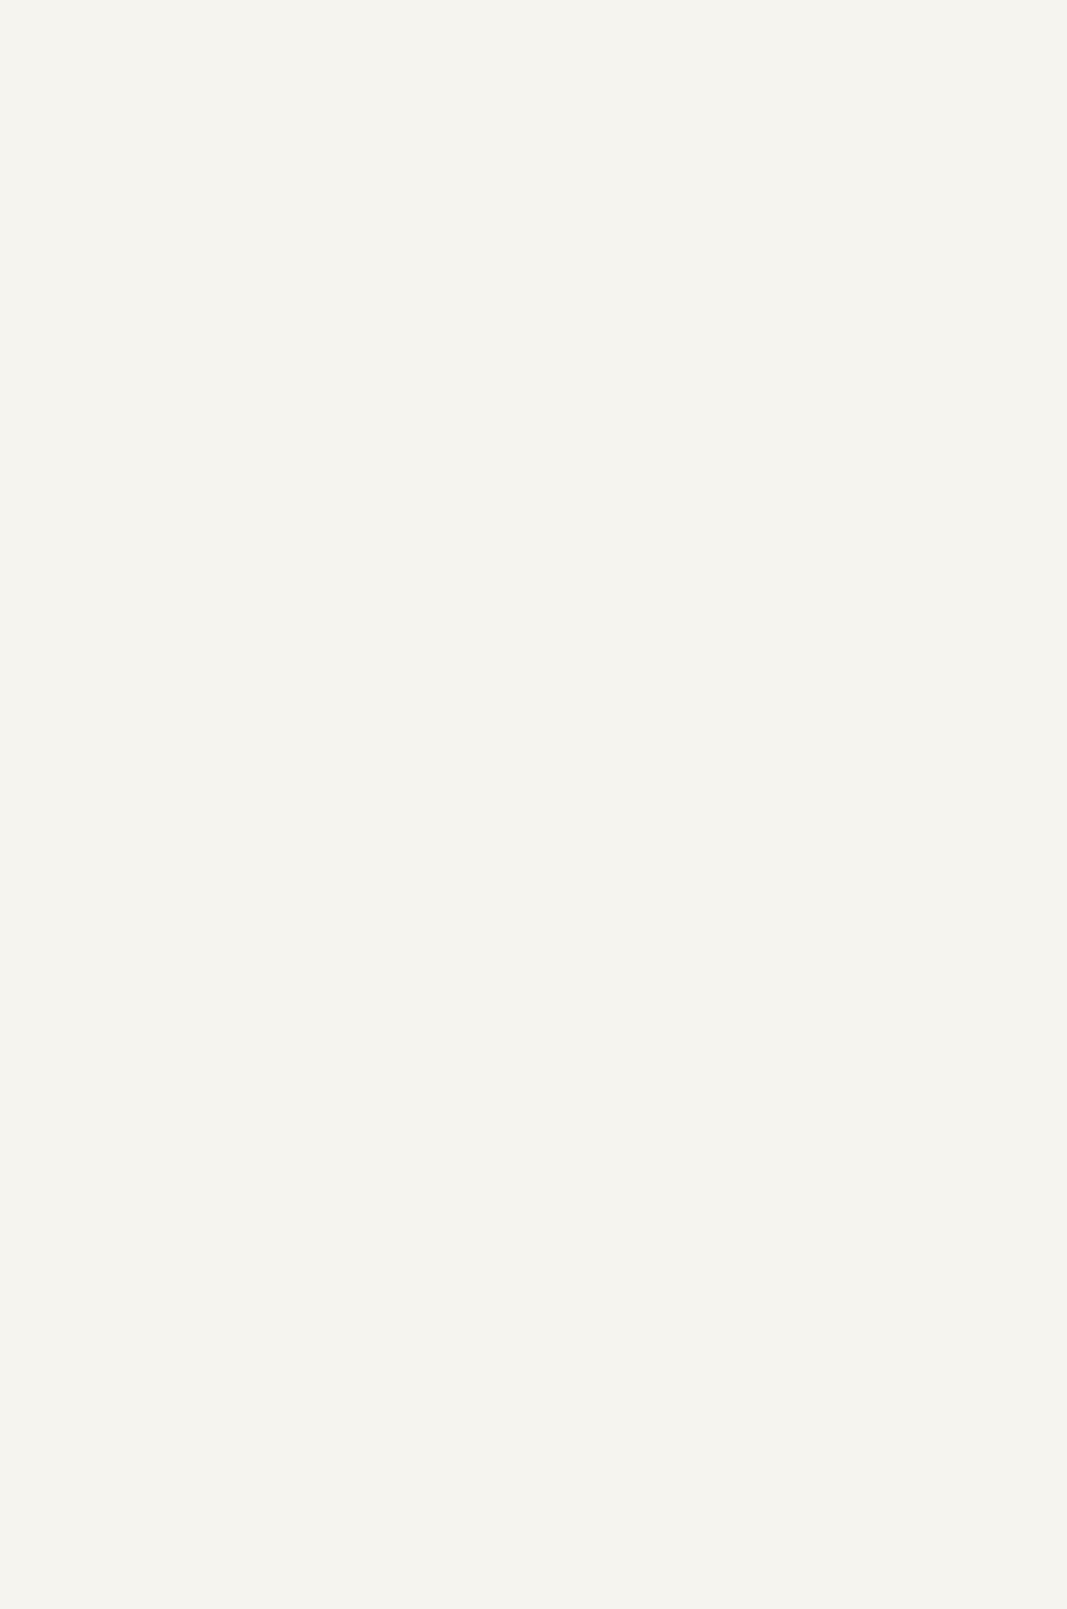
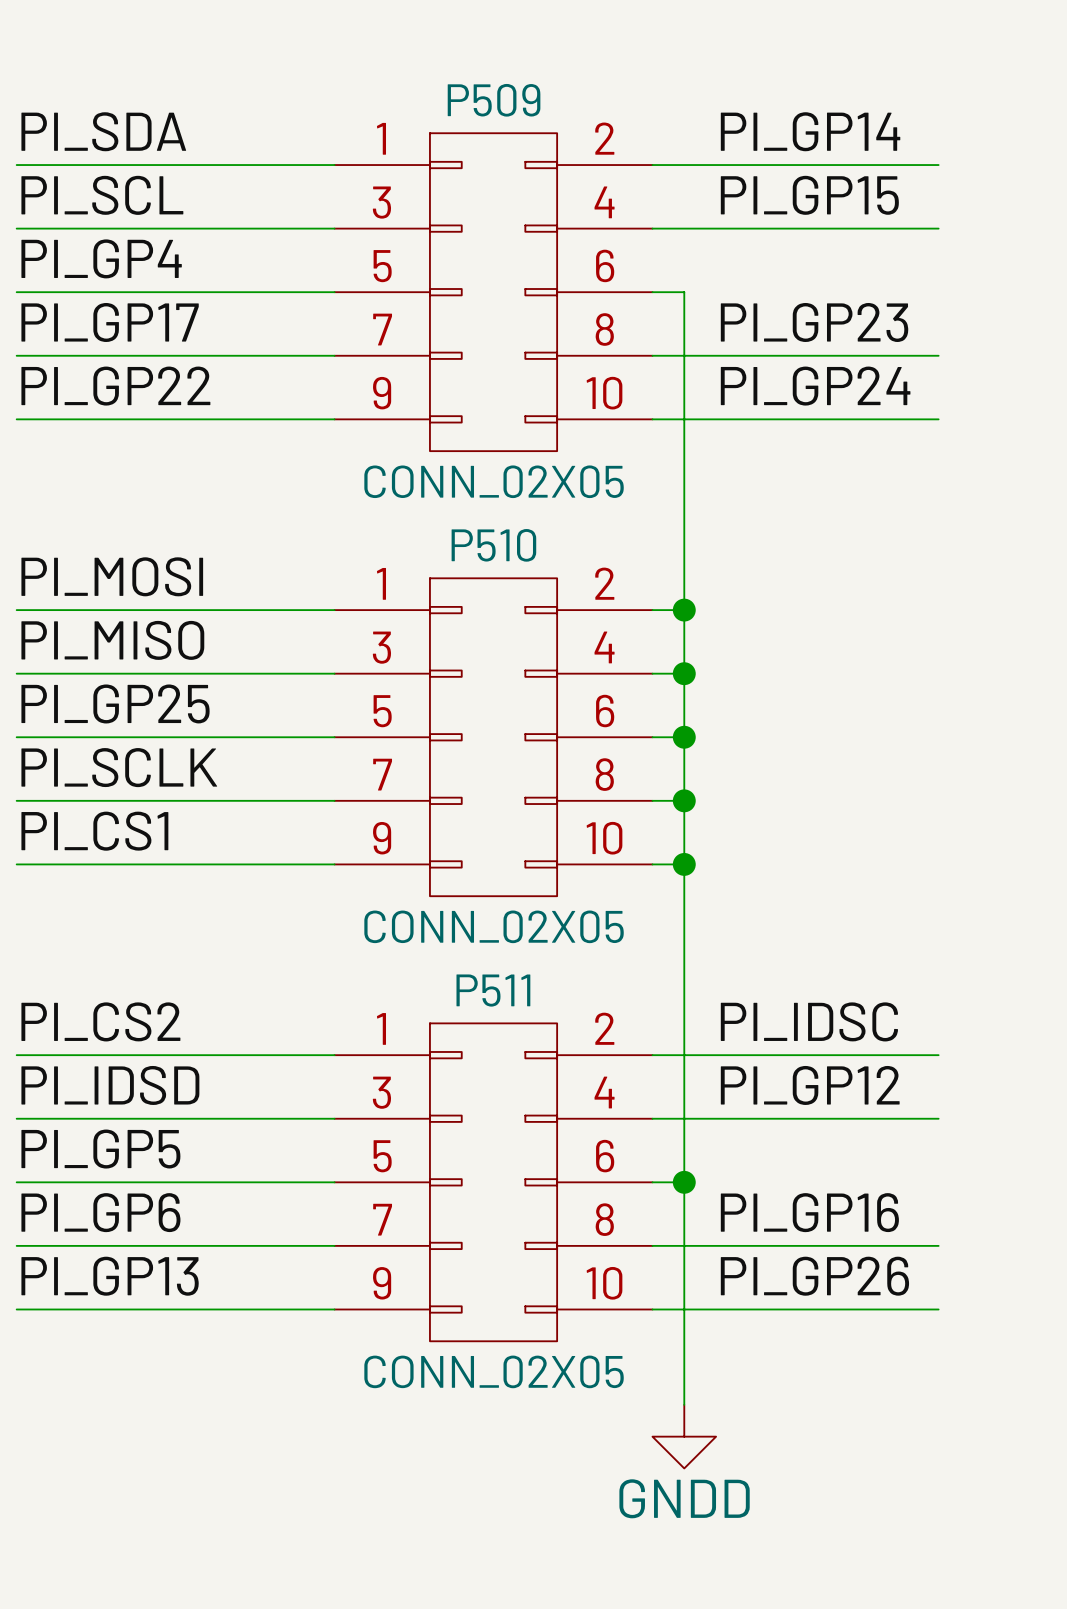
label: none -> PI_SDA (103, 131)
label: none -> PI_GP14 (810, 131)
wire: none -> (16, 165) (334, 165)
wire: none -> (652, 165) (938, 165)
label: none -> PI_SCL (102, 195)
label: none -> PI_GP15 (809, 195)
wire: none -> (16, 228) (334, 228)
wire: none -> (652, 228) (938, 228)
label: none -> PI_GP4 (101, 258)
wire: none -> (16, 292) (334, 292)
P509: none -> CONN_02X05 (493, 292)
wire: none -> (652, 292) (684, 292) (684, 1404)
label: none -> PI_GP17 (110, 322)
label: none -> PI_GP23 (814, 322)
wire: none -> (16, 355) (334, 355)
wire: none -> (652, 355) (938, 355)
label: none -> PI_GP22 (115, 386)
label: none -> PI_GP24 (815, 386)
wire: none -> (16, 419) (334, 419)
wire: none -> (652, 419) (938, 419)
label: none -> PI_MOSI (112, 576)
wire: none -> (16, 610) (334, 610)
wire: none -> (652, 610) (684, 610)
junction: none -> (684, 610)
label: none -> PI_MISO (112, 640)
wire: none -> (16, 673) (334, 673)
wire: none -> (652, 673) (684, 673)
junction: none -> (684, 673)
label: none -> PI_GP25 (115, 703)
wire: none -> (16, 737) (334, 737)
P510: none -> CONN_02X05 (493, 737)
wire: none -> (652, 737) (684, 737)
junction: none -> (684, 737)
label: none -> PI_SCLK (119, 767)
wire: none -> (16, 800) (334, 800)
wire: none -> (652, 800) (684, 800)
junction: none -> (684, 800)
label: none -> PI_CS1 (94, 831)
wire: none -> (16, 864) (334, 864)
wire: none -> (652, 864) (684, 864)
junction: none -> (684, 864)
label: none -> PI_CS2 (100, 1021)
label: none -> PI_IDSC (809, 1021)
wire: none -> (16, 1055) (334, 1055)
wire: none -> (652, 1055) (938, 1055)
label: none -> PI_IDSD (110, 1085)
label: none -> PI_GP12 (810, 1085)
wire: none -> (16, 1118) (334, 1118)
wire: none -> (652, 1118) (938, 1118)
label: none -> PI_GP5 (100, 1149)
wire: none -> (16, 1182) (334, 1182)
P511: none -> CONN_02X05 (493, 1182)
wire: none -> (652, 1182) (684, 1182)
junction: none -> (684, 1182)
label: none -> PI_GP6 (100, 1212)
label: none -> PI_GP16 (809, 1212)
wire: none -> (16, 1245) (334, 1245)
wire: none -> (652, 1245) (938, 1245)
label: none -> PI_GP13 (110, 1276)
label: none -> PI_GP26 (814, 1276)
wire: none -> (16, 1309) (334, 1309)
wire: none -> (652, 1309) (938, 1309)
power symbol: none -> GNDD (684, 1436)

